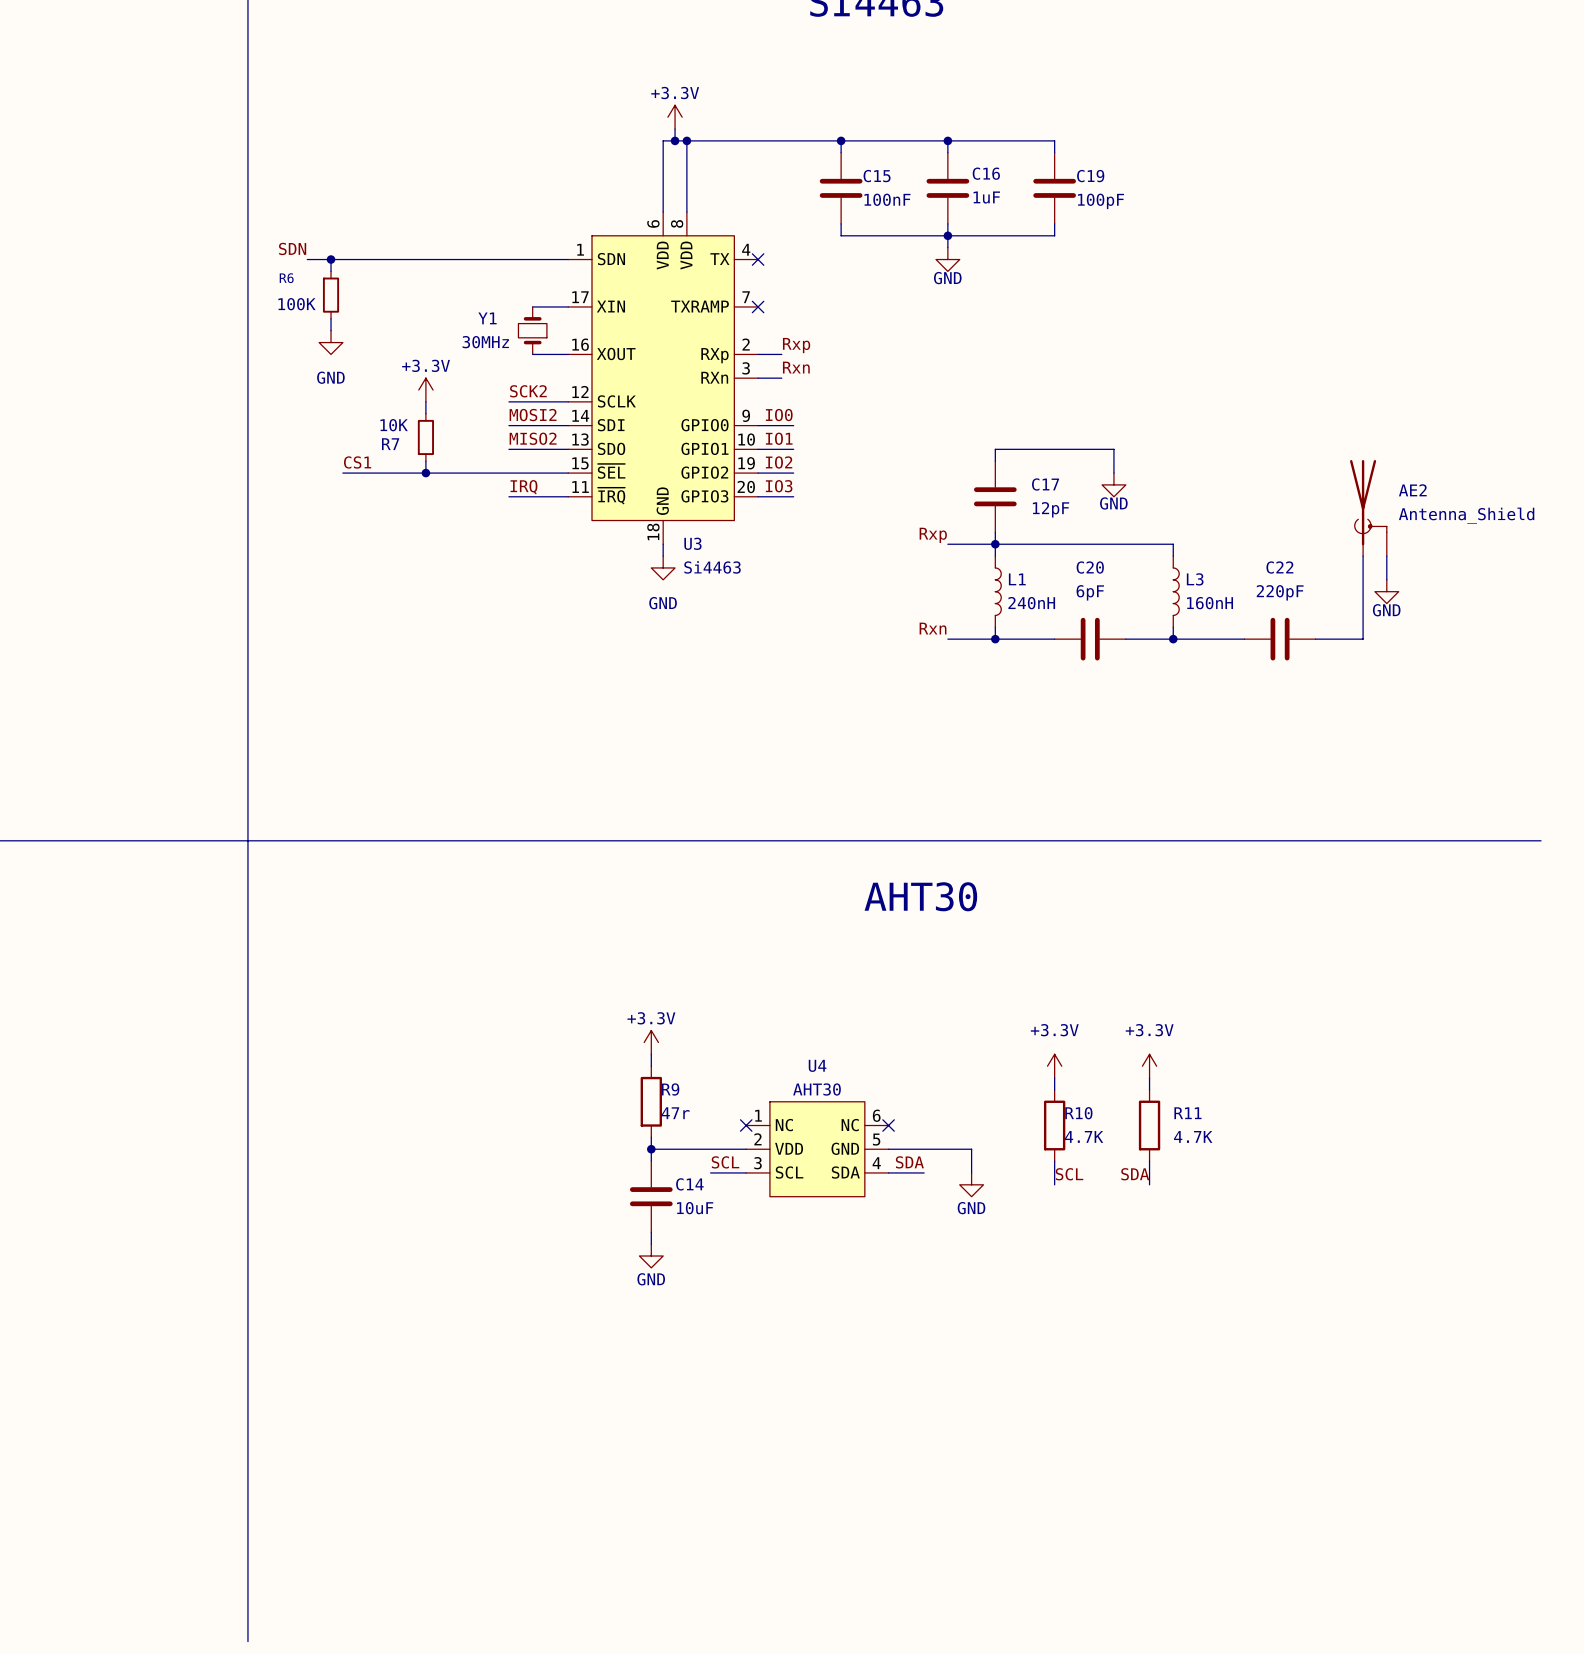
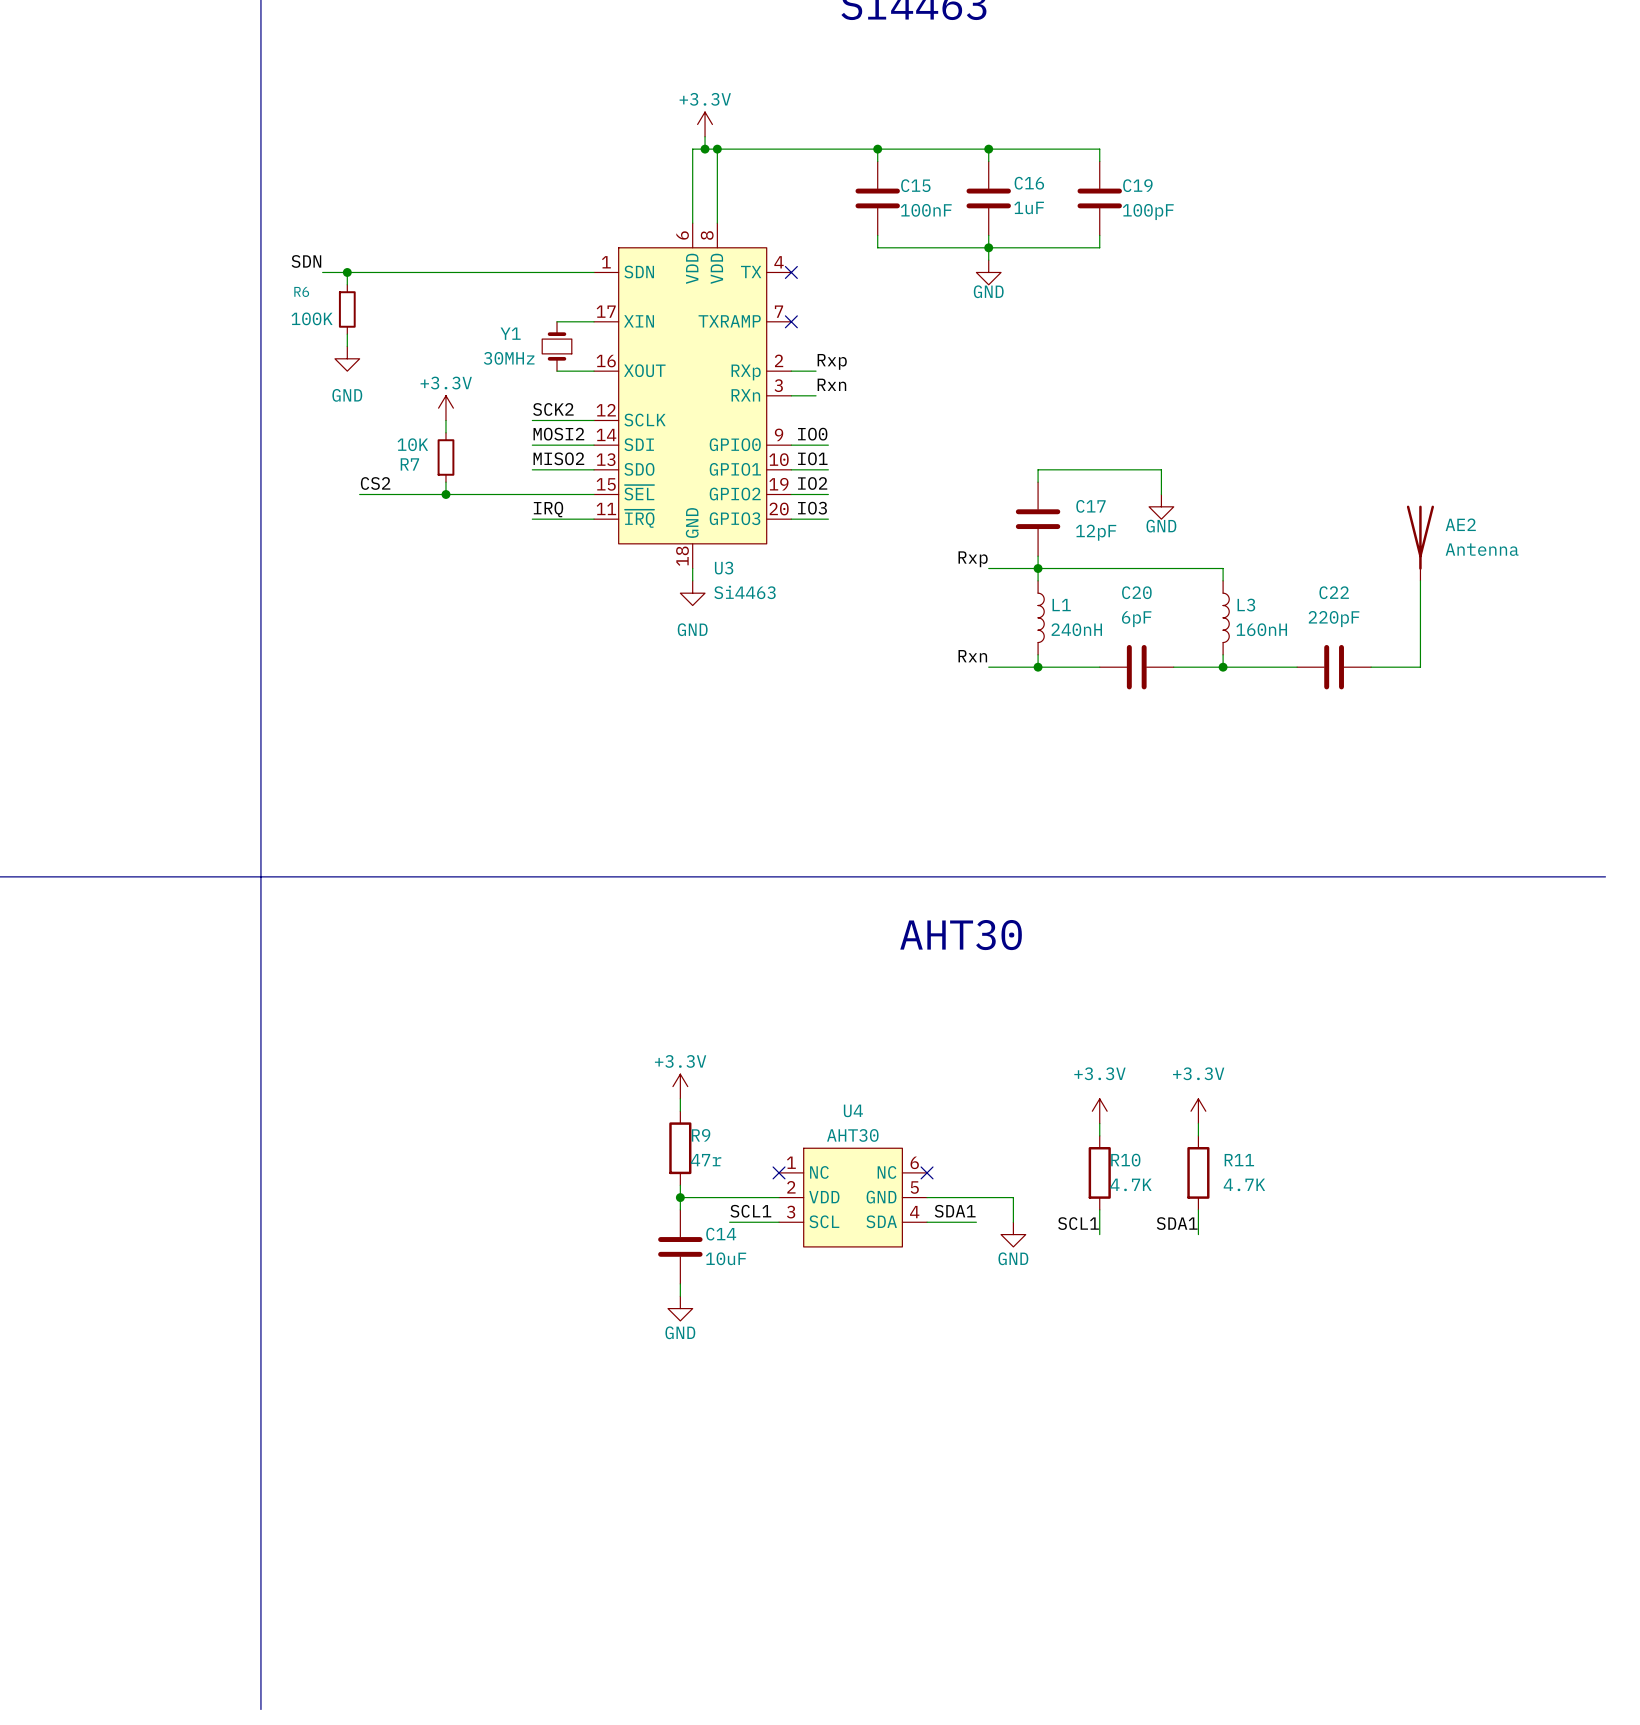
AE2 symbol: [1350, 460, 1387, 557] -> [1406, 505, 1435, 581]
label: CS1 (357, 462) -> CS2 (375, 483)
AE2 value: Antenna_Shield (1466, 515) -> Antenna (1482, 549)
wire: (1386, 556) (1386, 579) -> none
power symbol: GND (1386, 591) -> none
label: SCL (725, 1162) -> SCL1 (750, 1211)
label: SDA (909, 1162) -> SDA1 (955, 1211)
wire: none -> (729, 1222) (742, 1222)
wire: none -> (964, 1222) (976, 1222)
label: SCL (1069, 1174) -> SCL1 (1078, 1223)
label: SDA (1135, 1174) -> SDA1 (1177, 1223)

